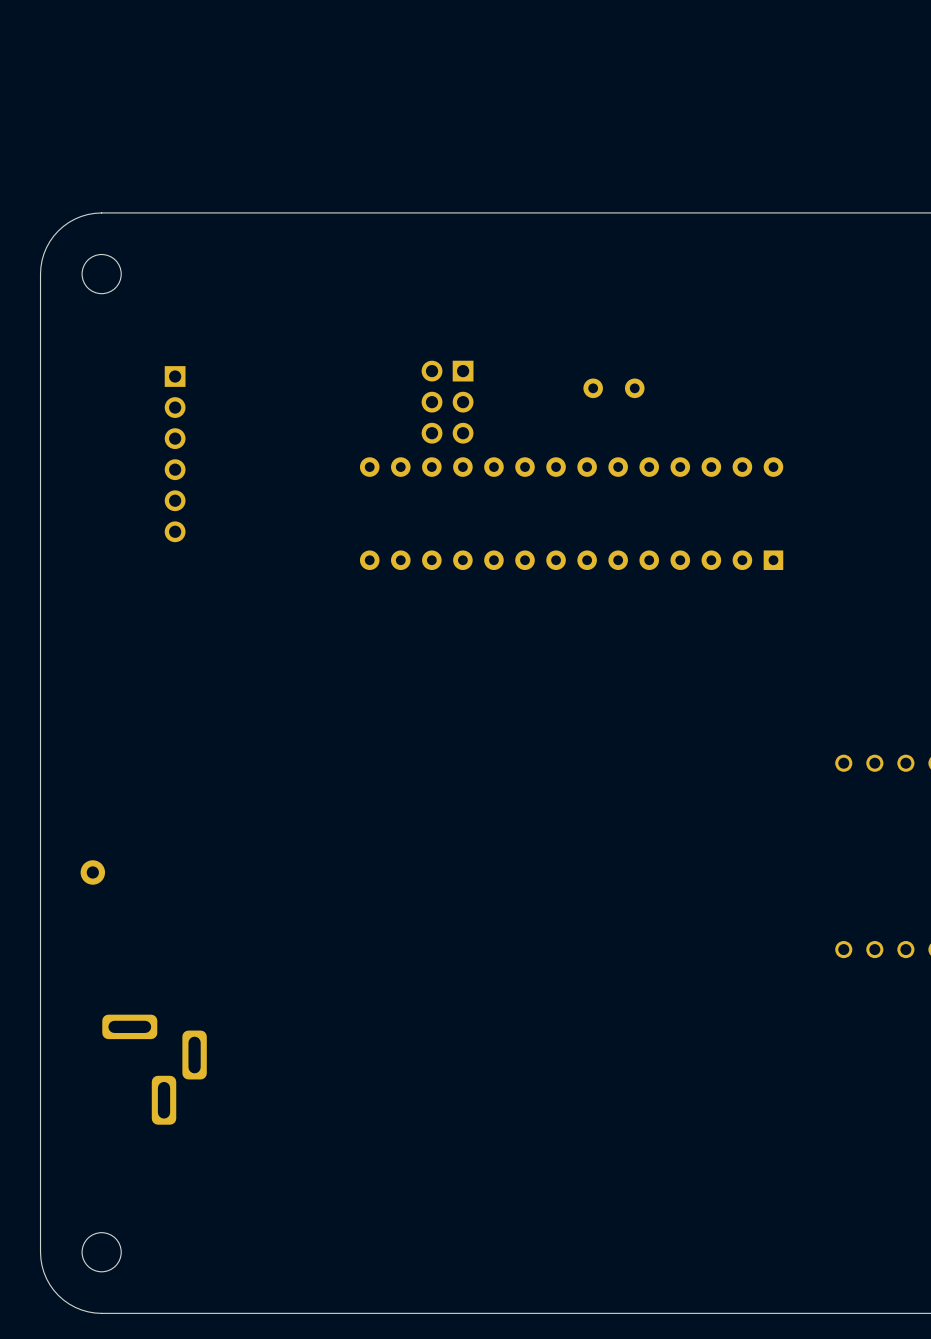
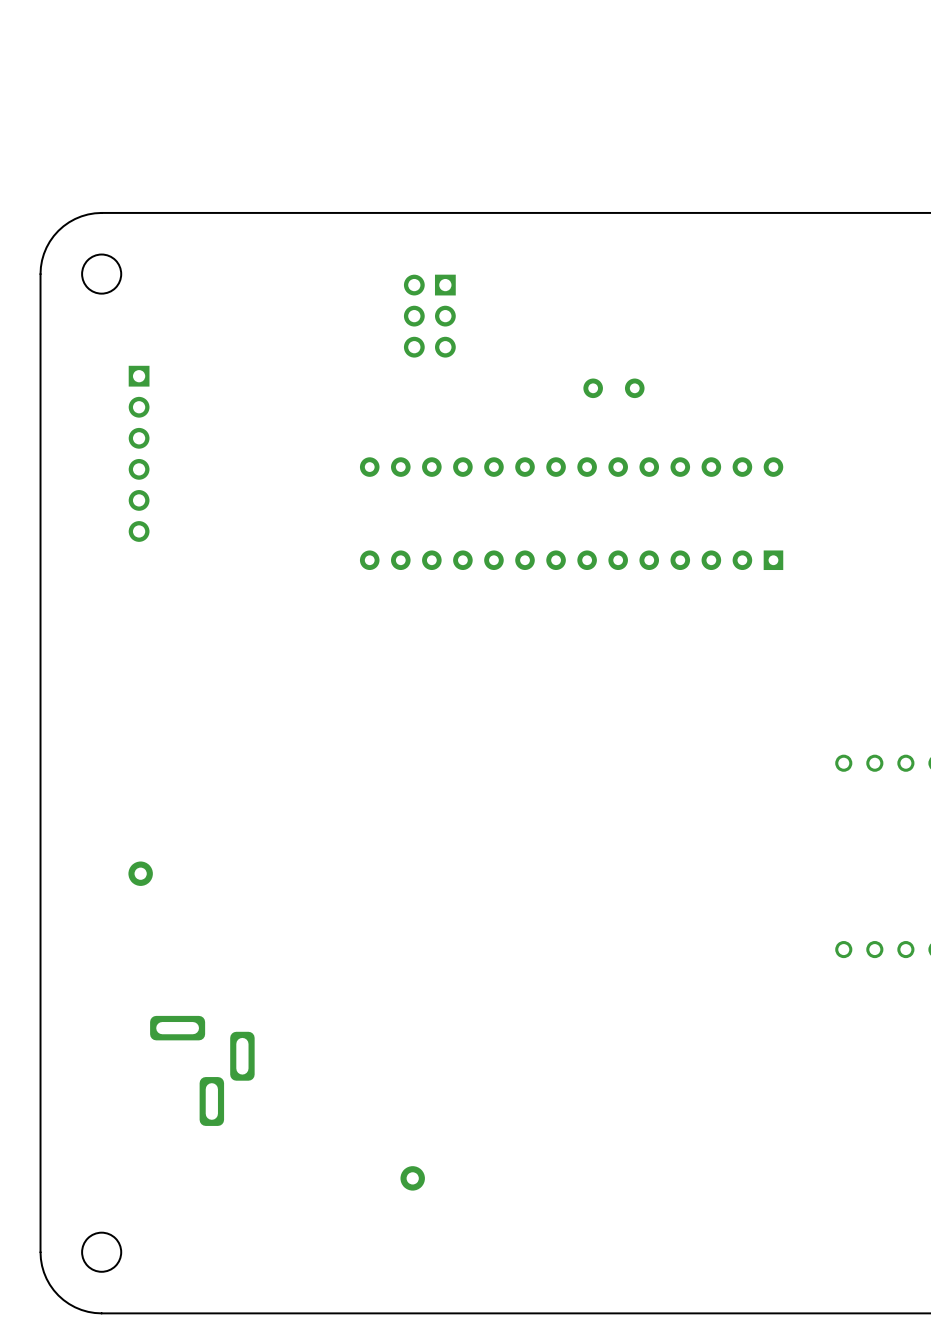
part position: (447, 402) -> (429, 316)
part position: (175, 454) -> (139, 453)
part position: (92, 872) -> (140, 873)
part position: (154, 1069) -> (202, 1070)
part: none -> (412, 1178)

